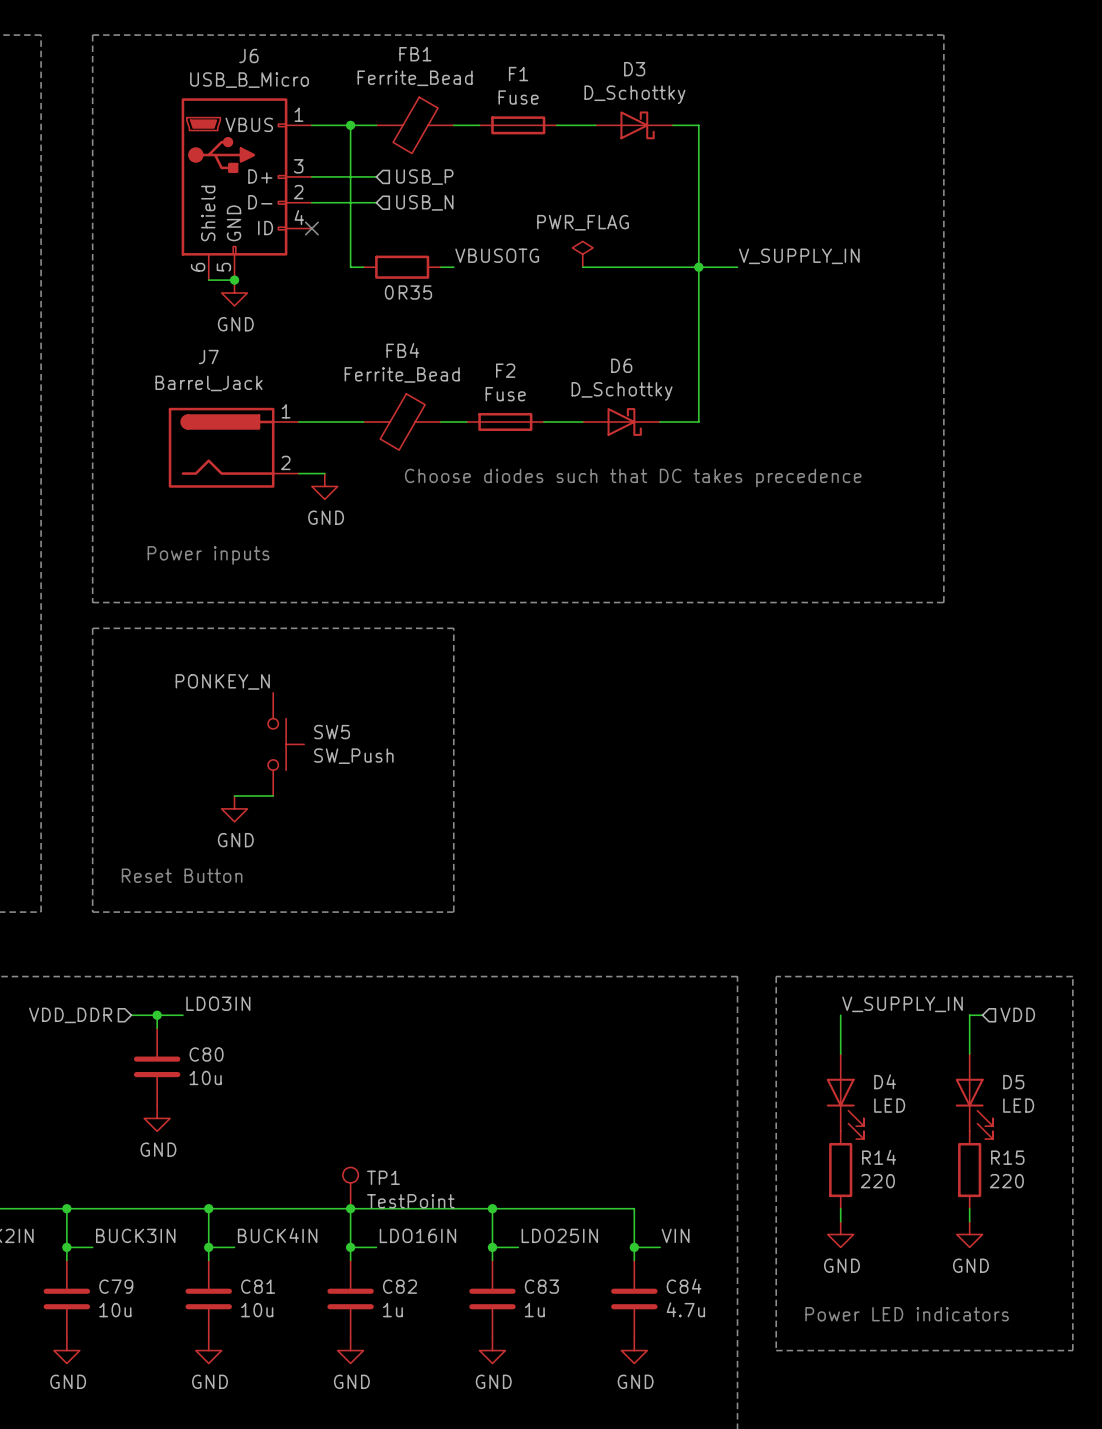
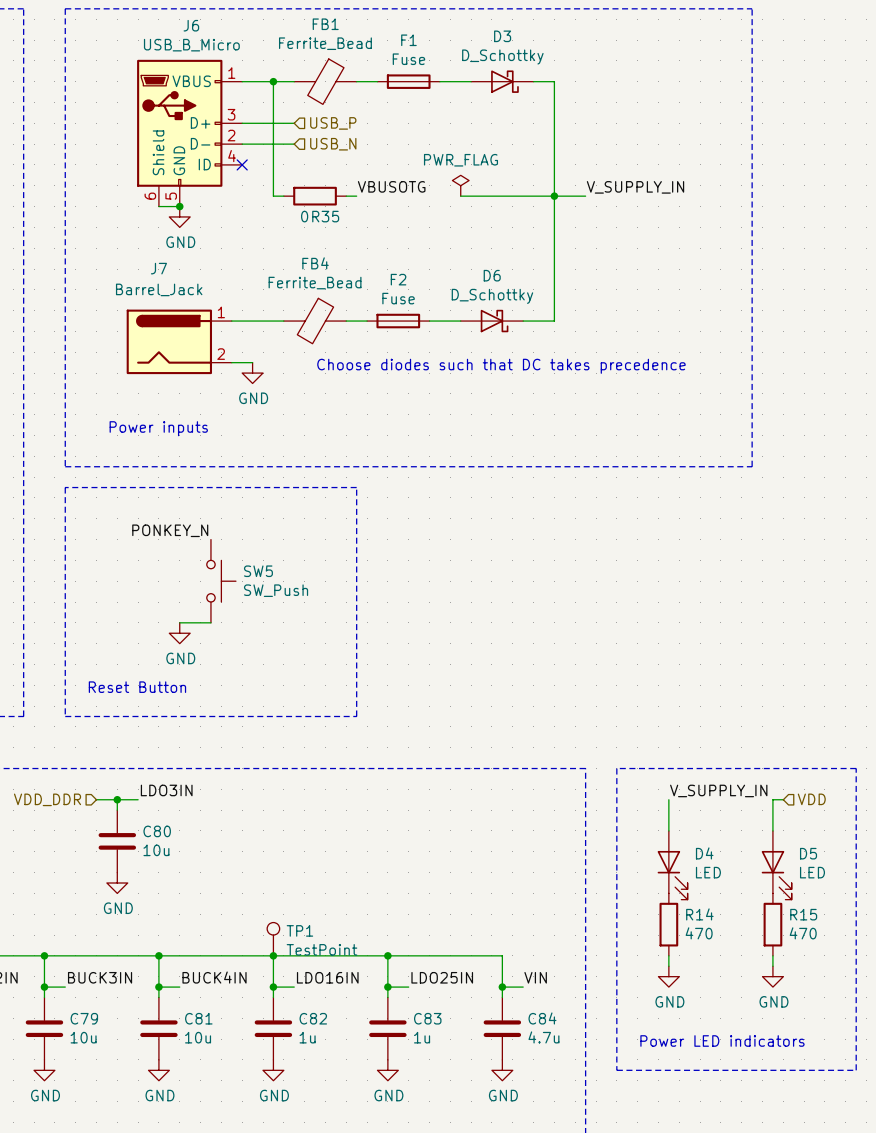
R14 value: 220 (877, 1181) -> 470 (699, 933)
R15 value: 220 (1006, 1181) -> 470 (803, 933)

